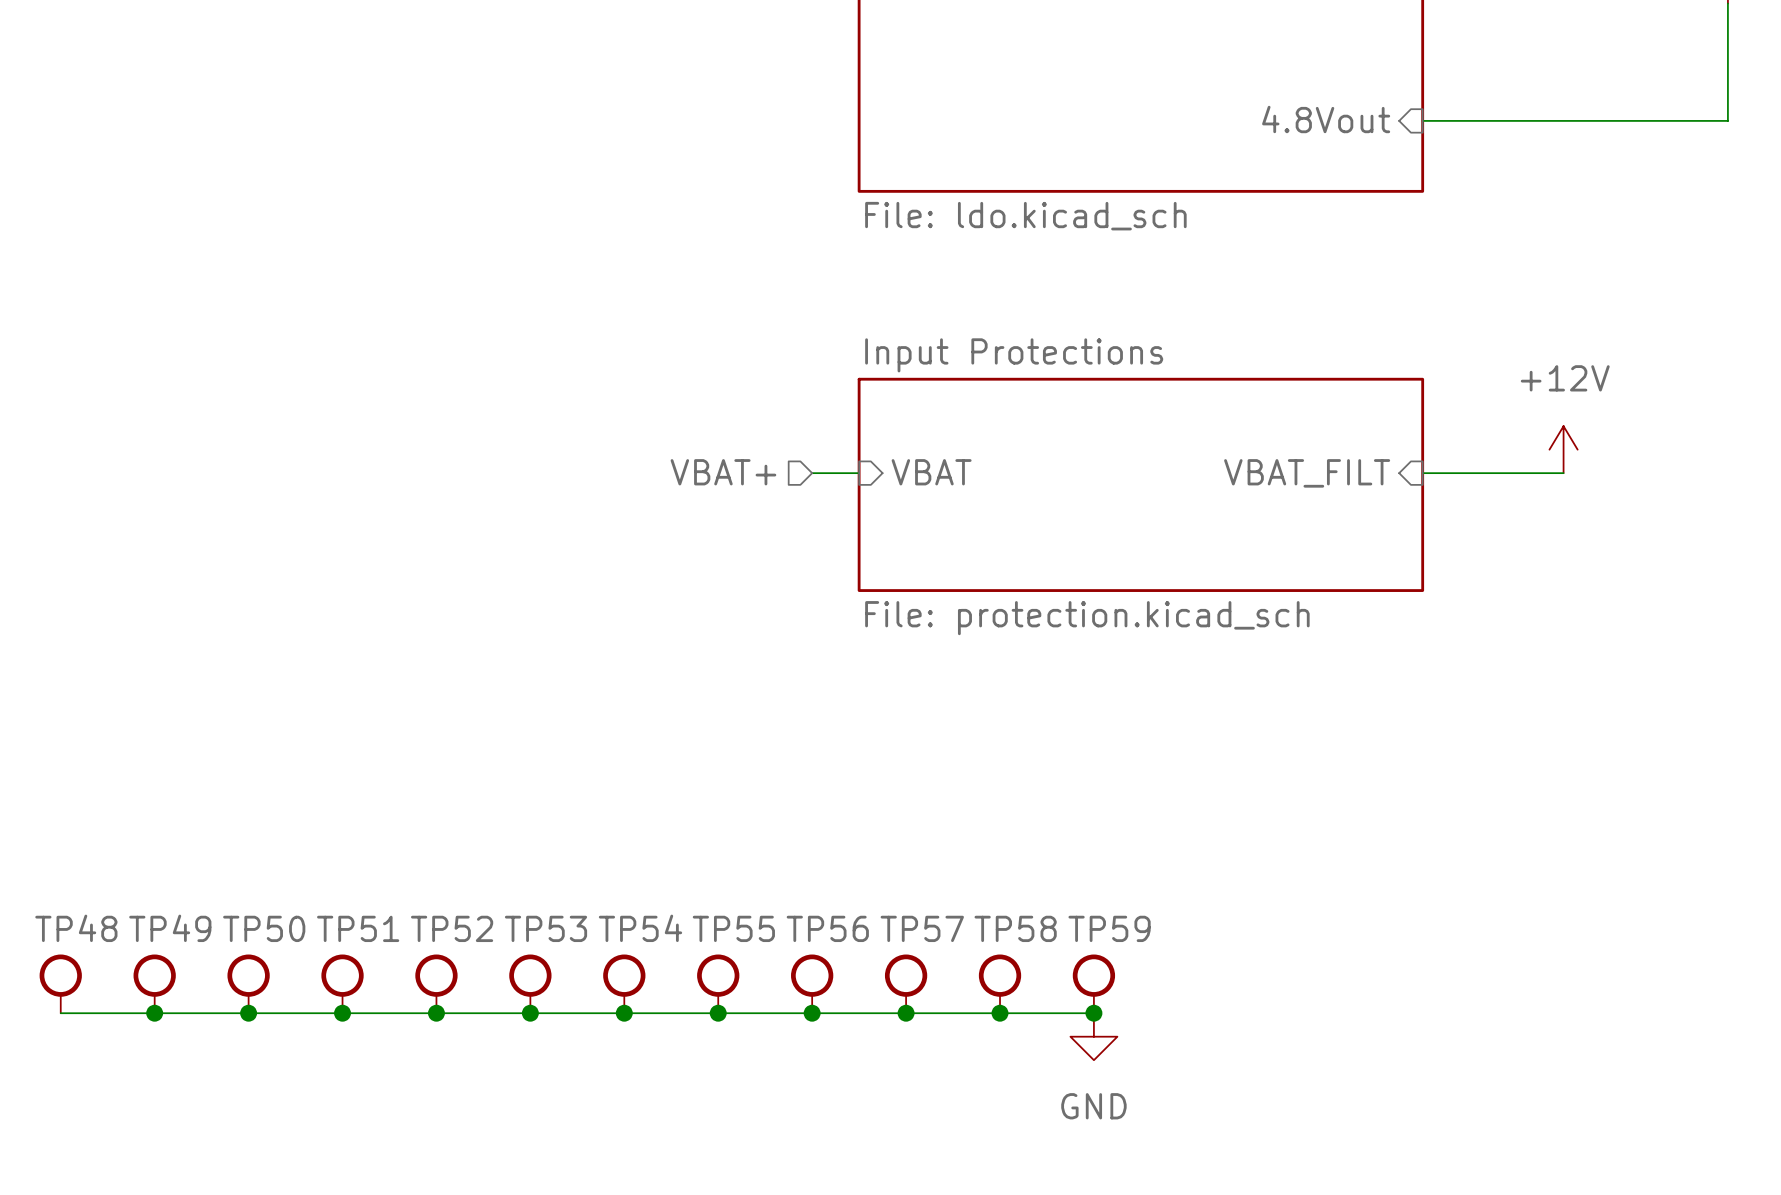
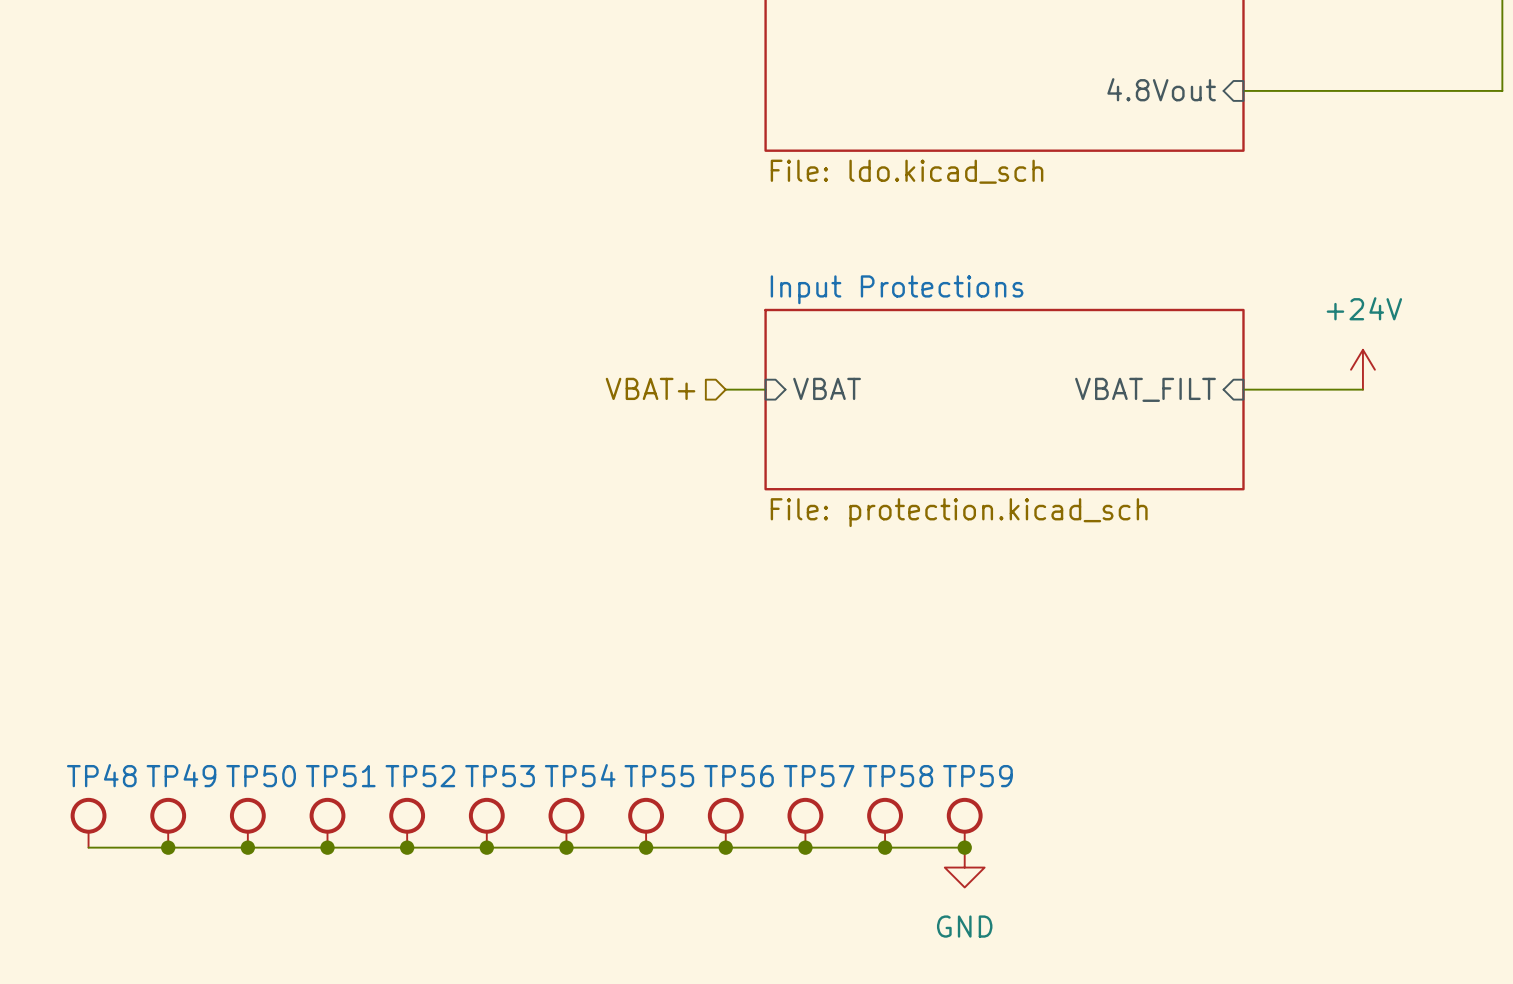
power symbol: +12V (1563, 449) -> +24V (1362, 369)

